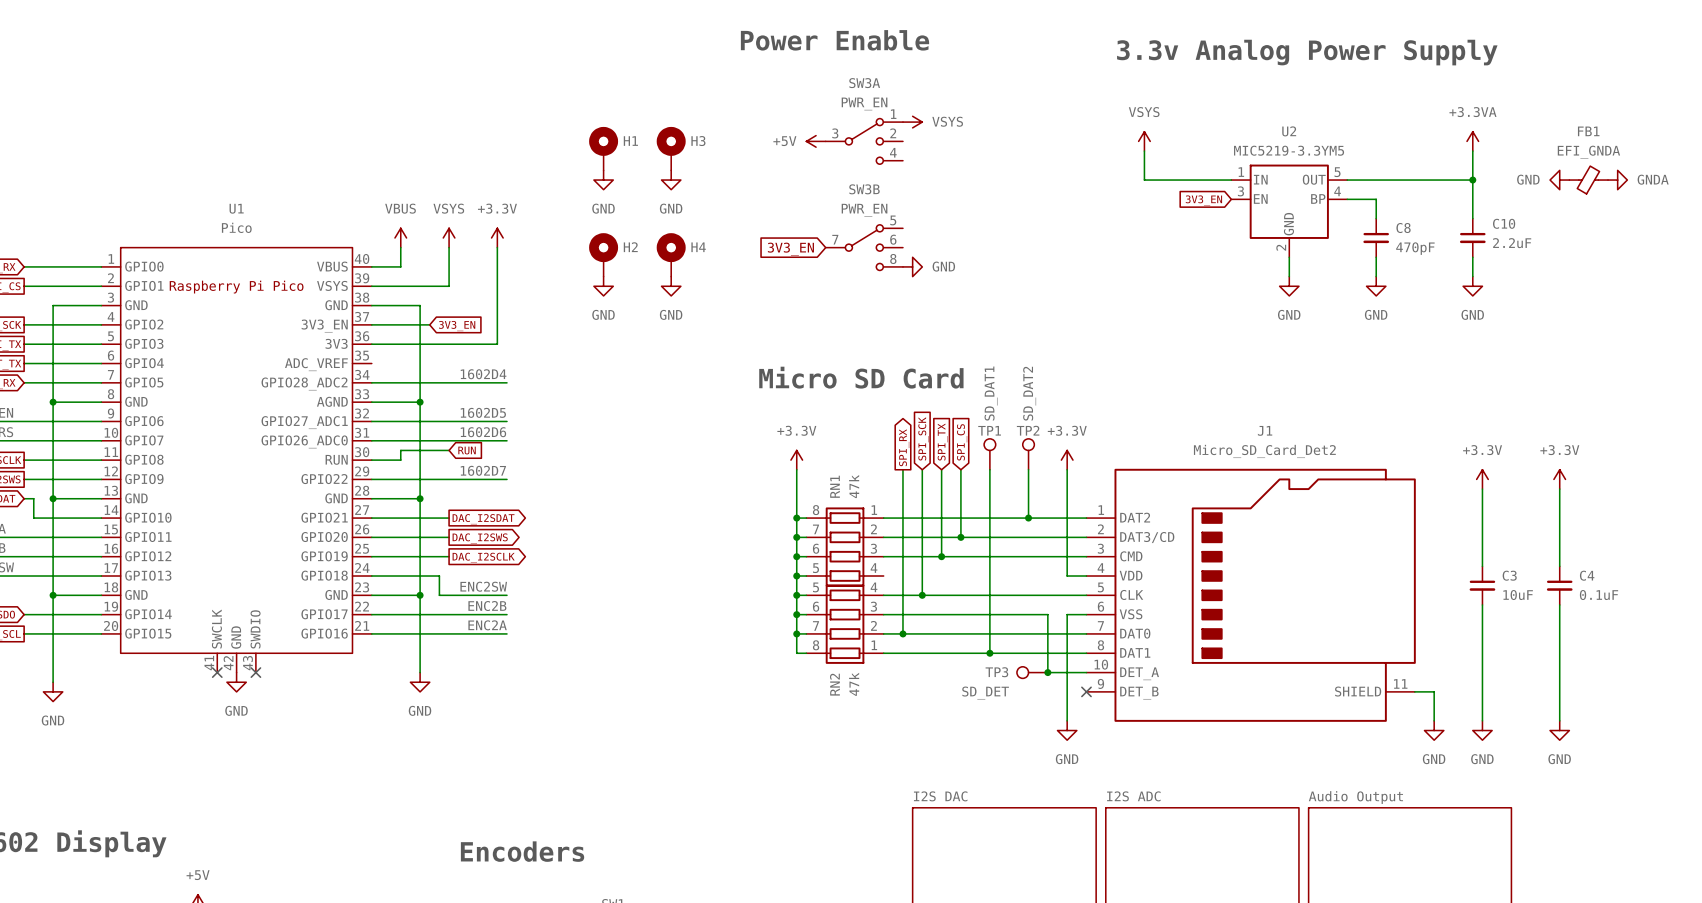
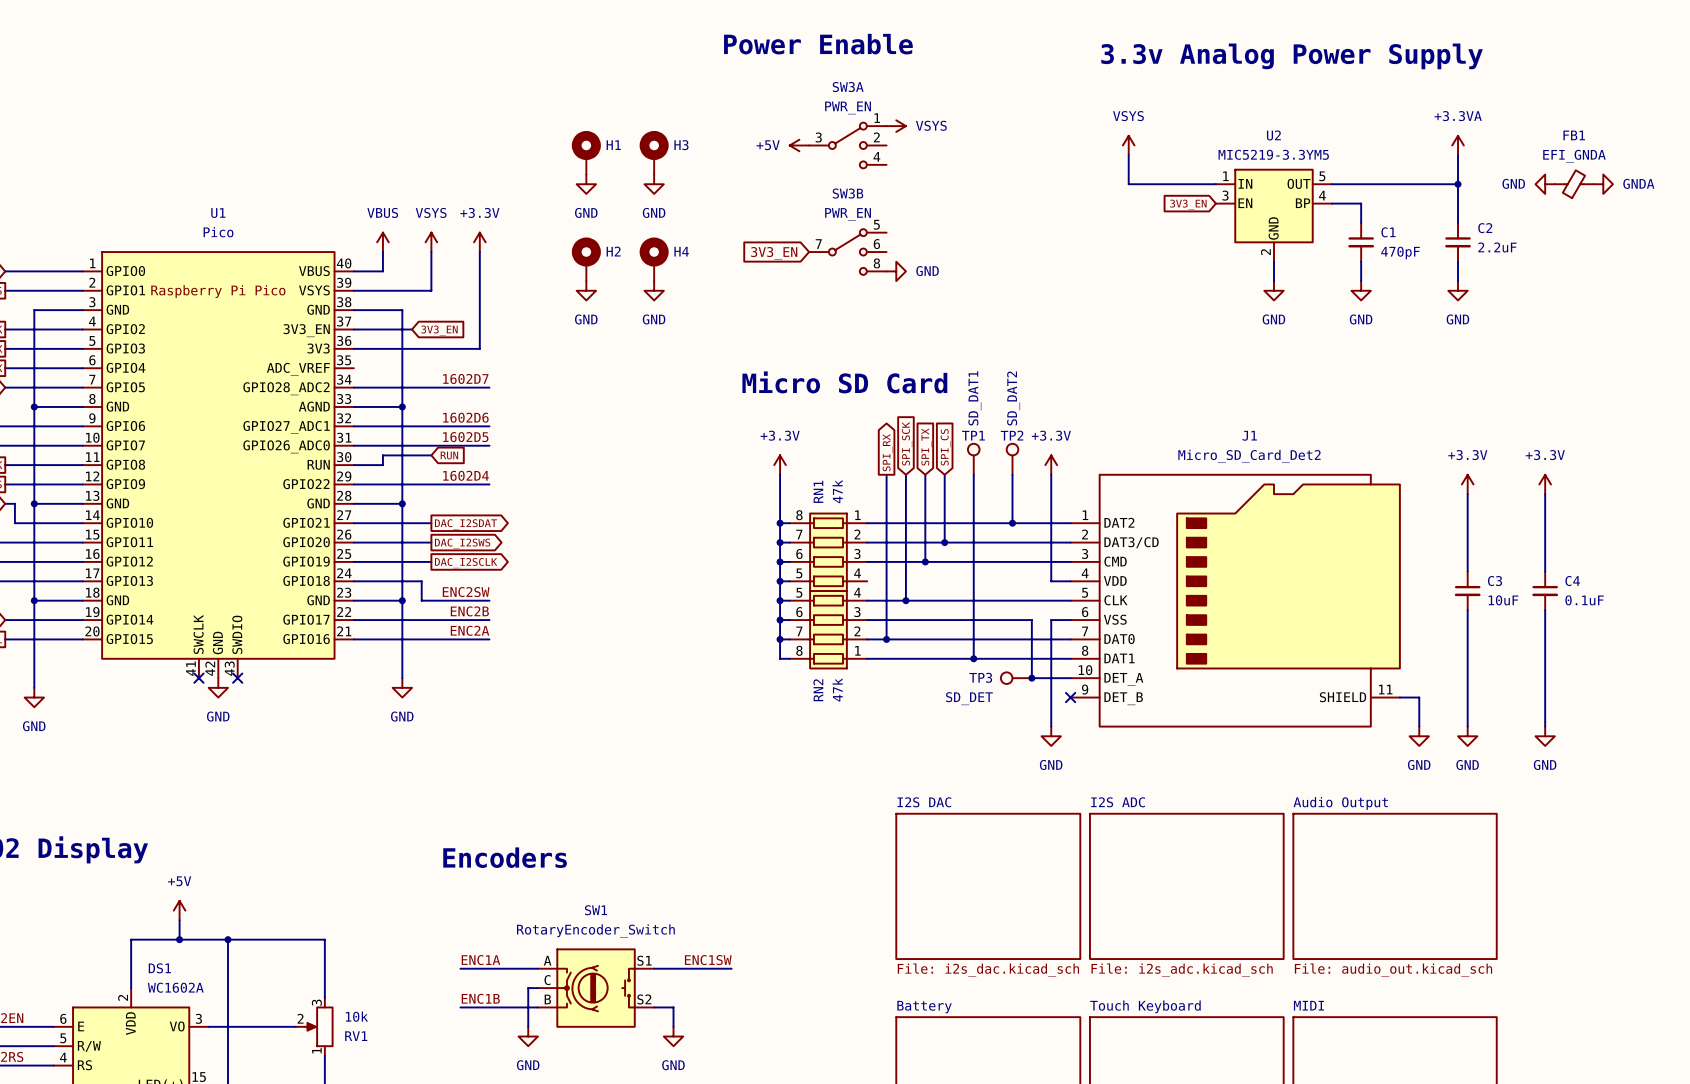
C10 name: C10 (1504, 223) -> C2 (1485, 228)
C8 name: C8 (1403, 228) -> C1 (1388, 232)
label: 1602D4 (483, 374) -> 1602D7 (465, 378)
label: 1602D5 (483, 412) -> 1602D6 (465, 417)
label: 1602D6 (483, 432) -> 1602D5 (465, 437)
label: 1602D7 (483, 470) -> 1602D4 (465, 475)

